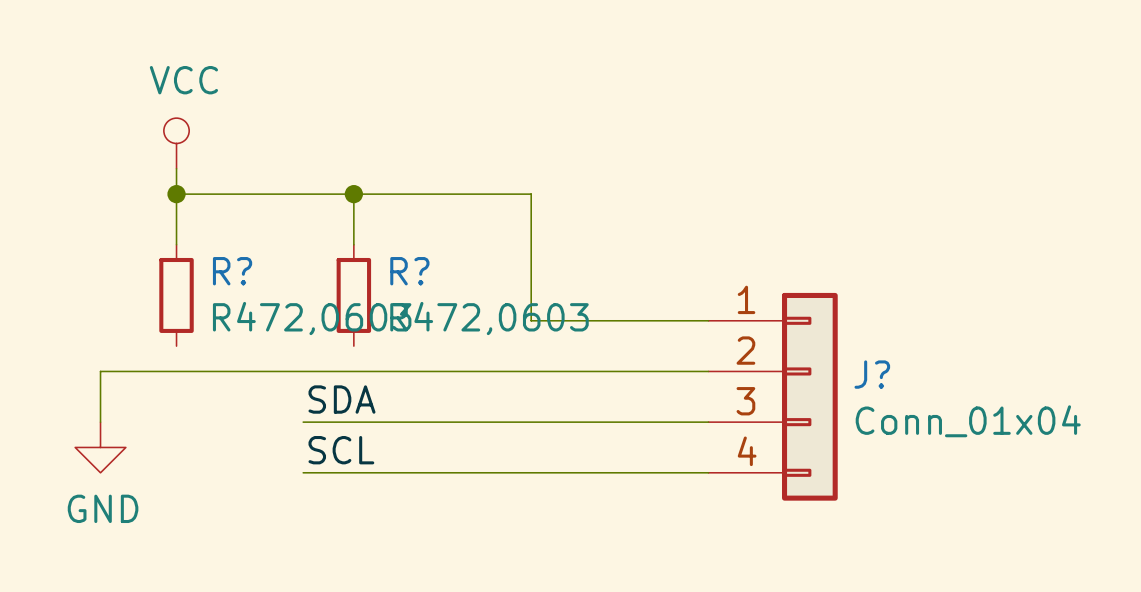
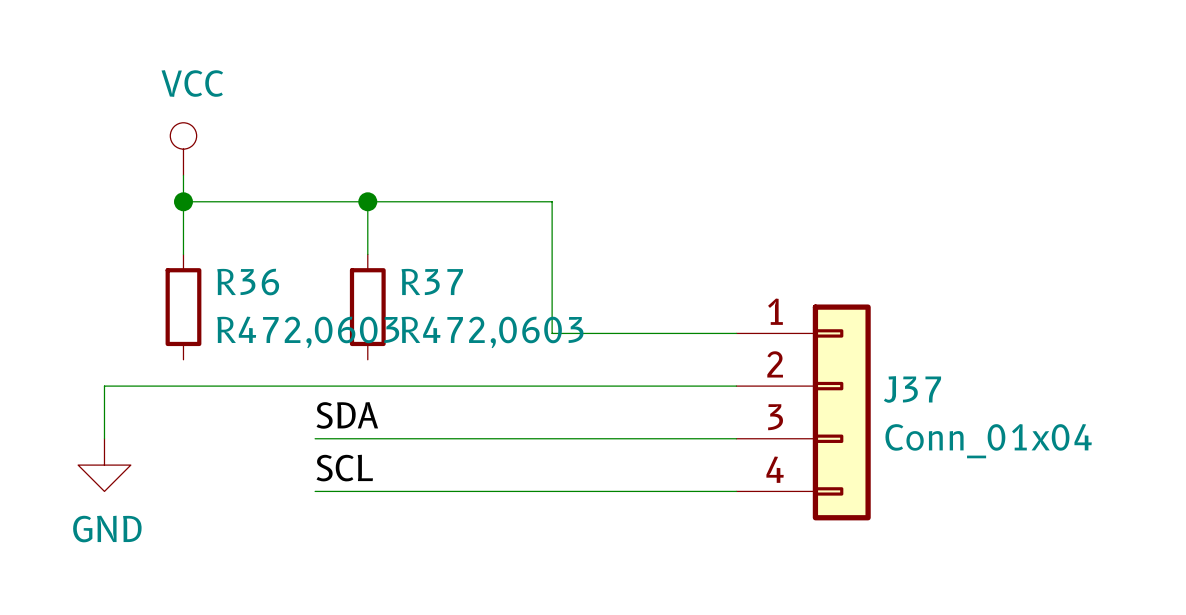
R? name: R? (232, 271) -> R36 (248, 282)
R? name: R? (409, 271) -> R37 (432, 281)
J? name: J? (872, 374) -> J37 (912, 389)

